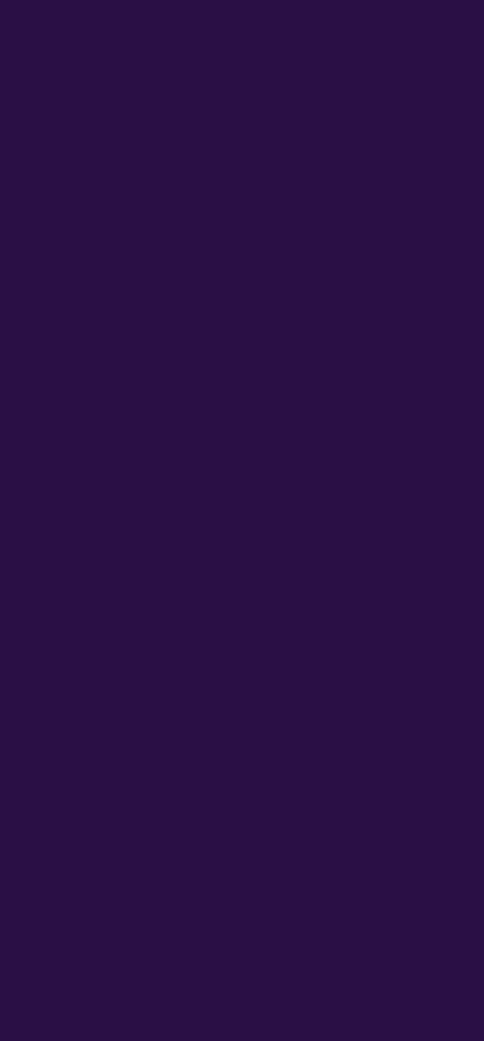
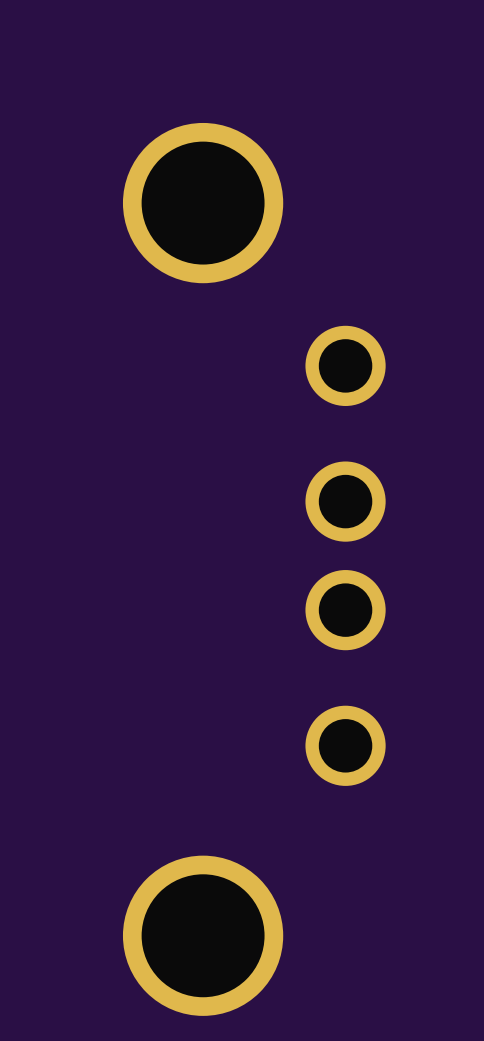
part: none -> (254, 569)

